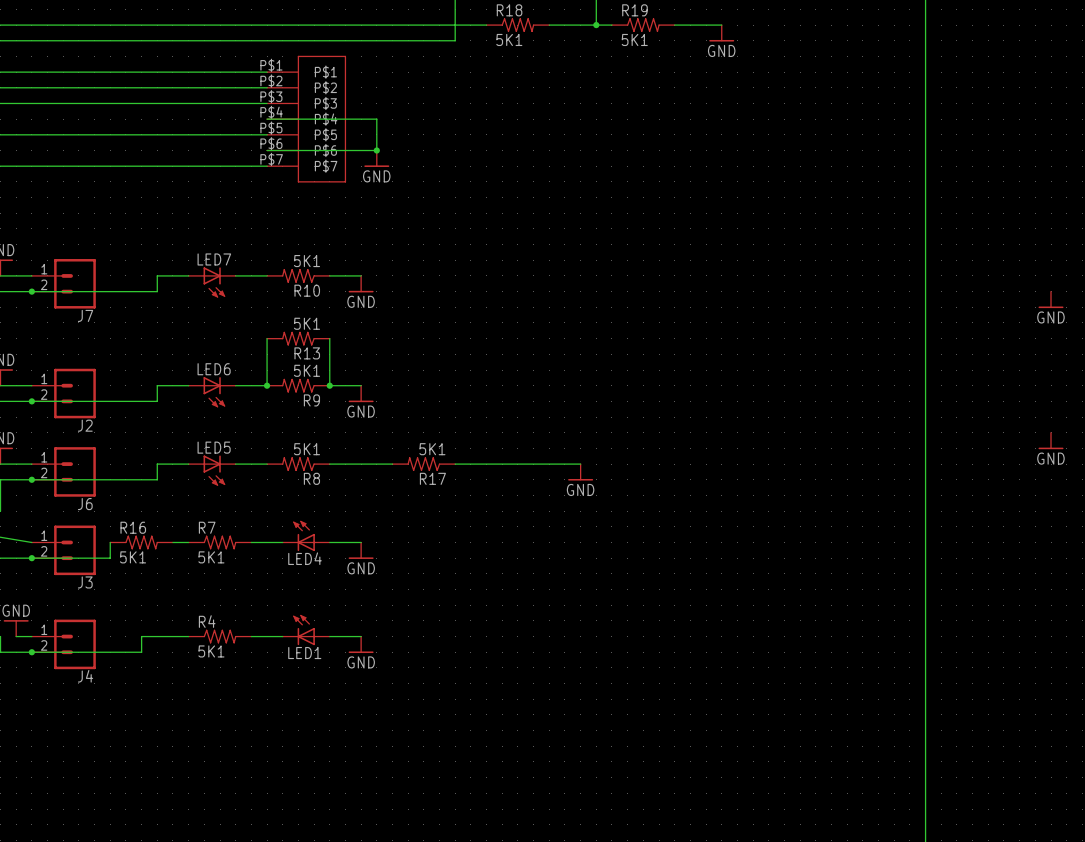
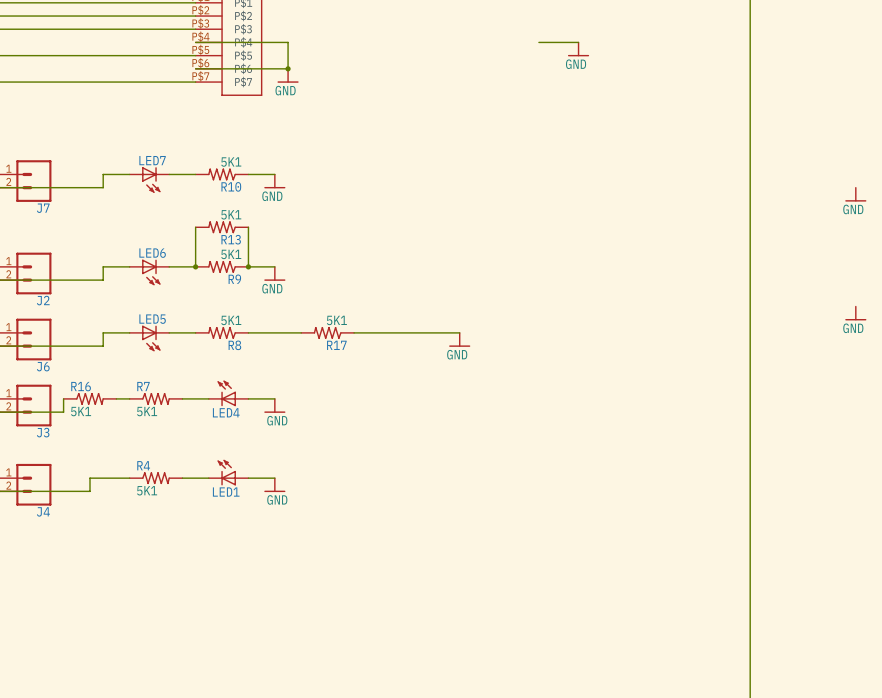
wire: none -> (538, 42) (578, 42)
power symbol: none -> GND (578, 49)

